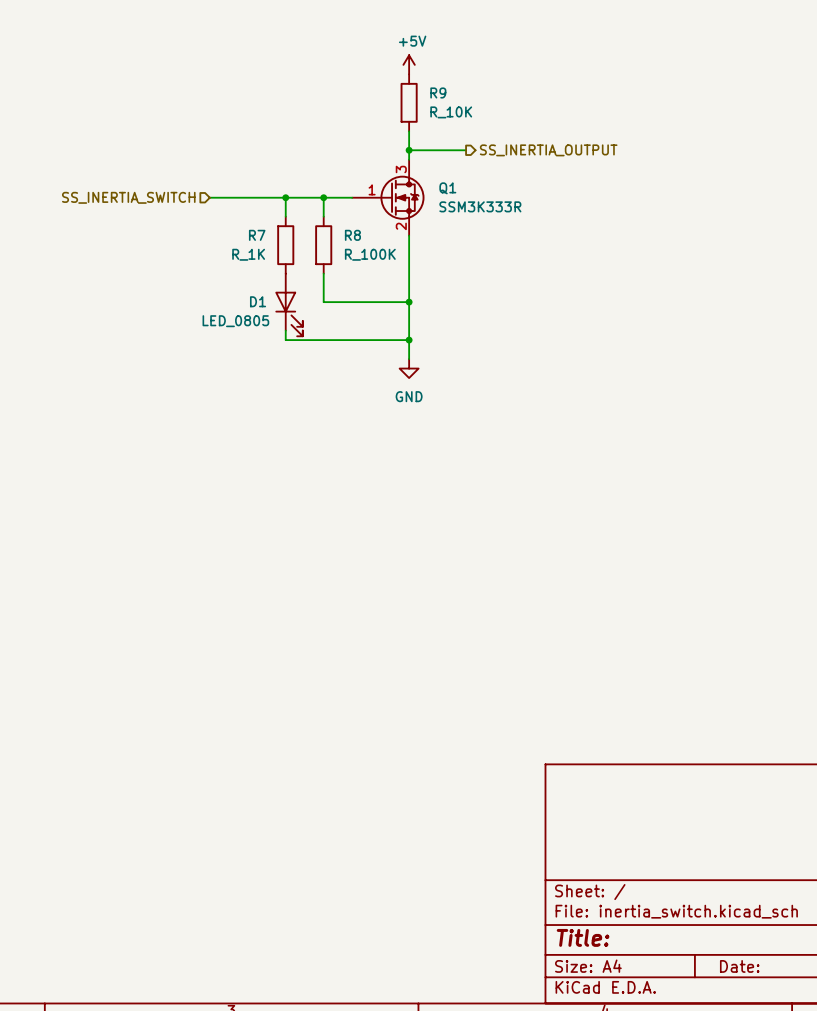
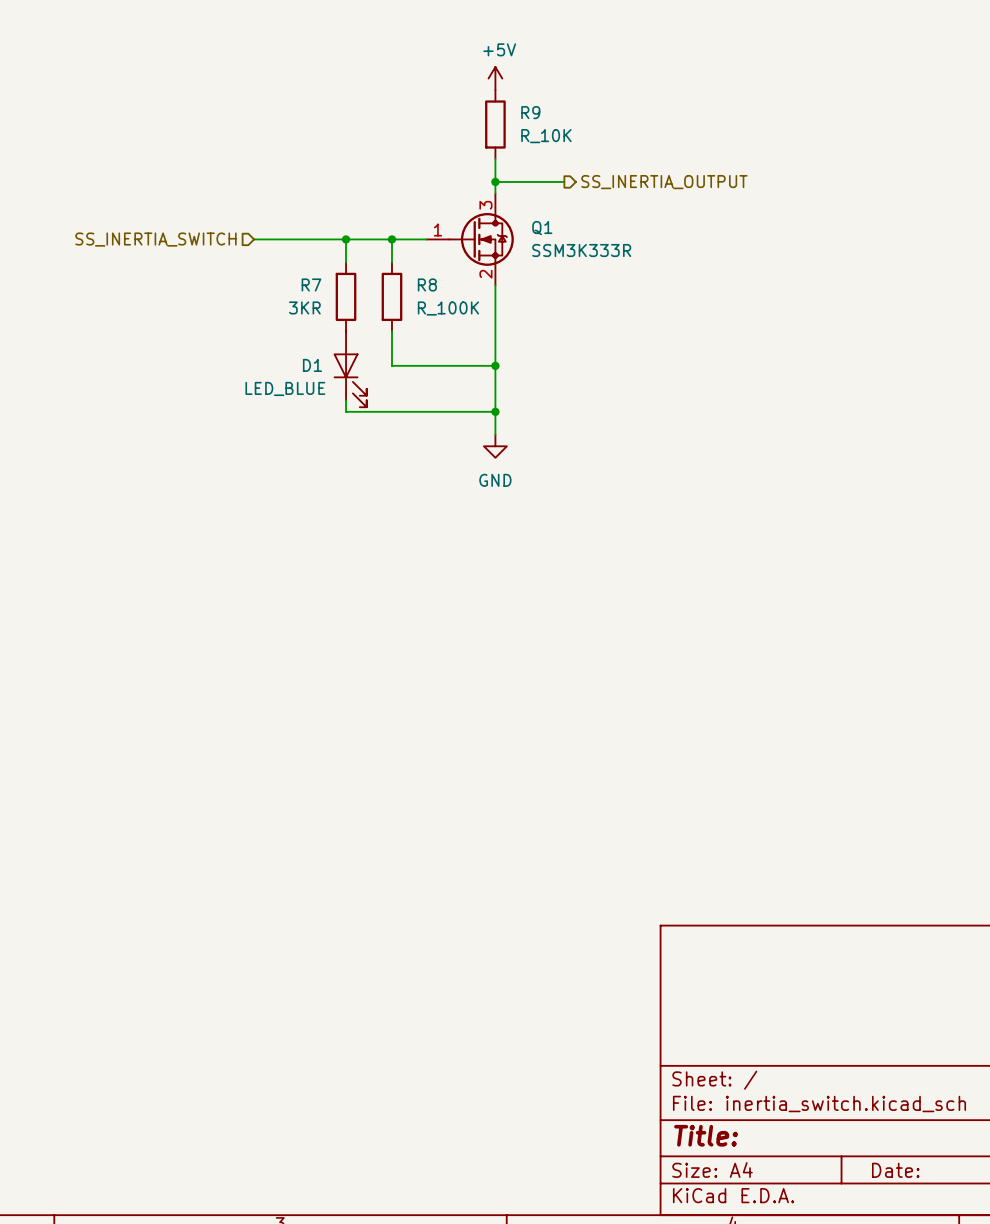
Q1 symbol: [352, 159, 425, 236] -> [426, 193, 514, 286]
R7 value: R_1K (248, 254) -> 3KR (304, 307)
D1 value: LED_0805 (235, 321) -> LED_BLUE (285, 388)

